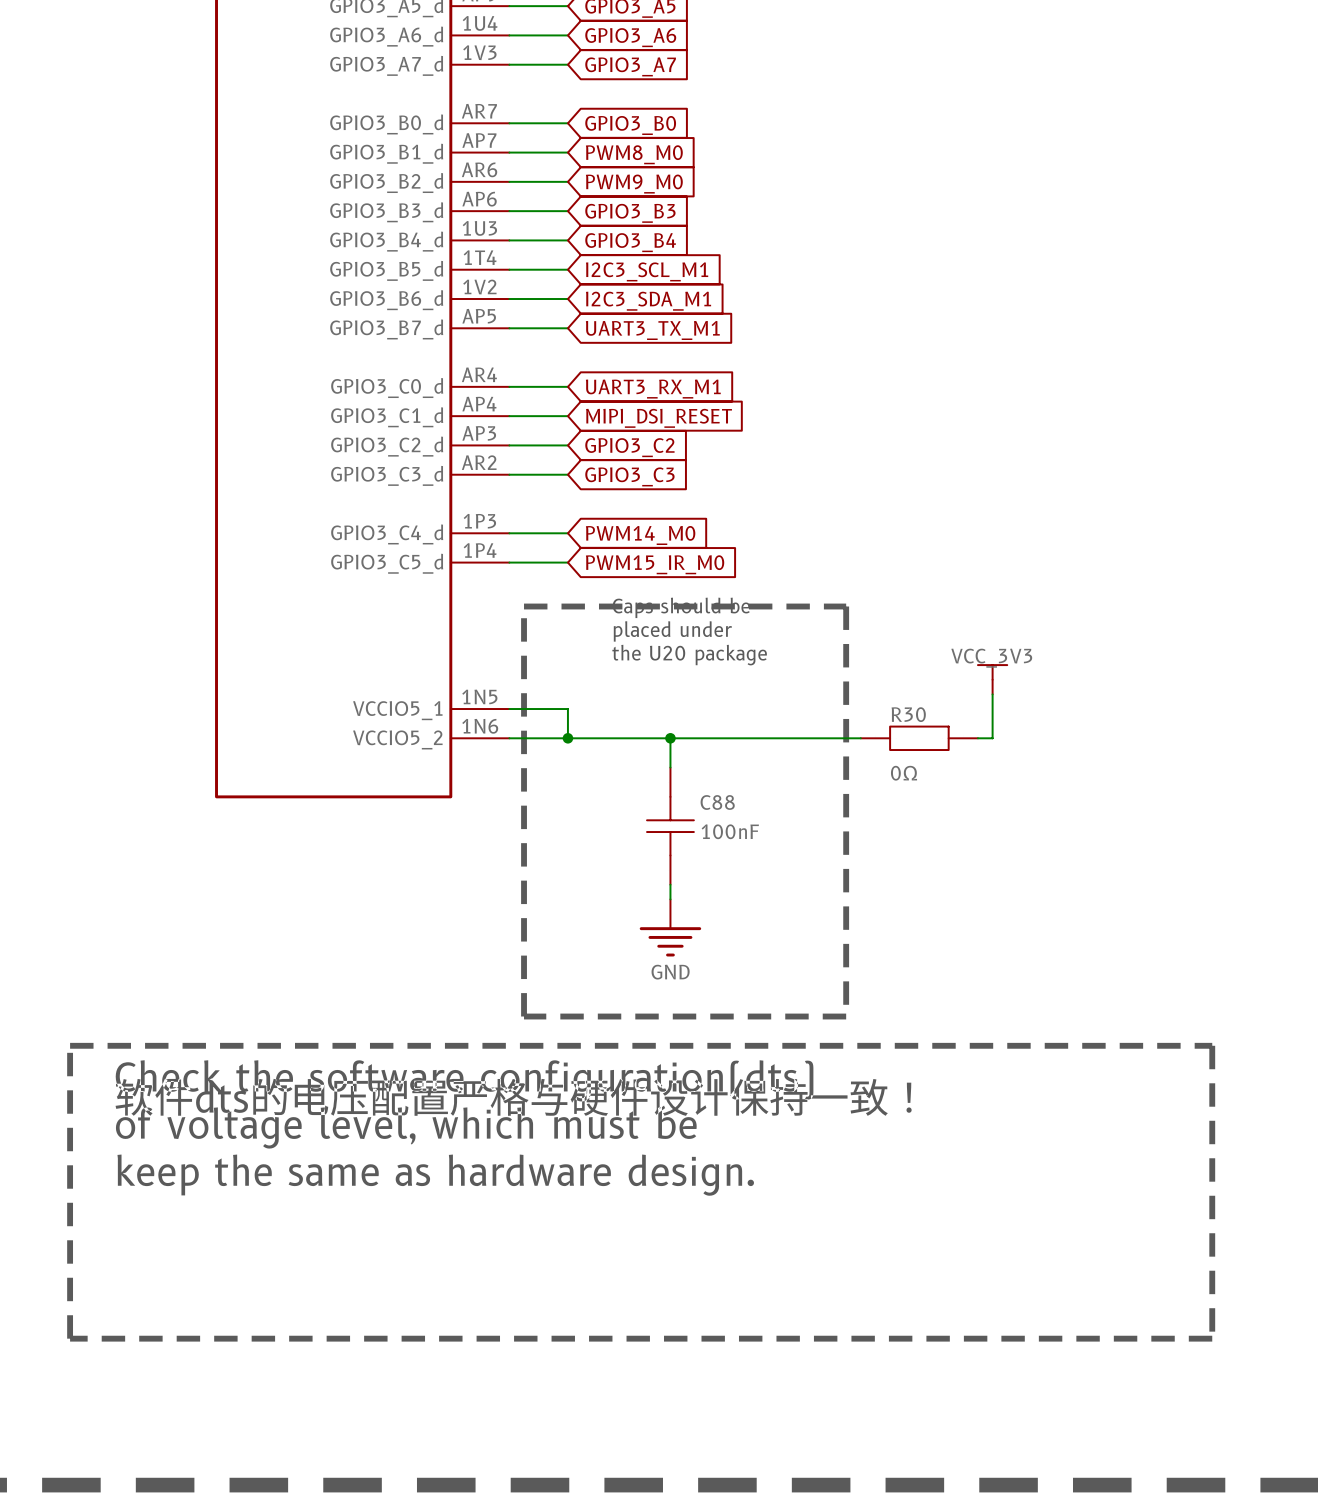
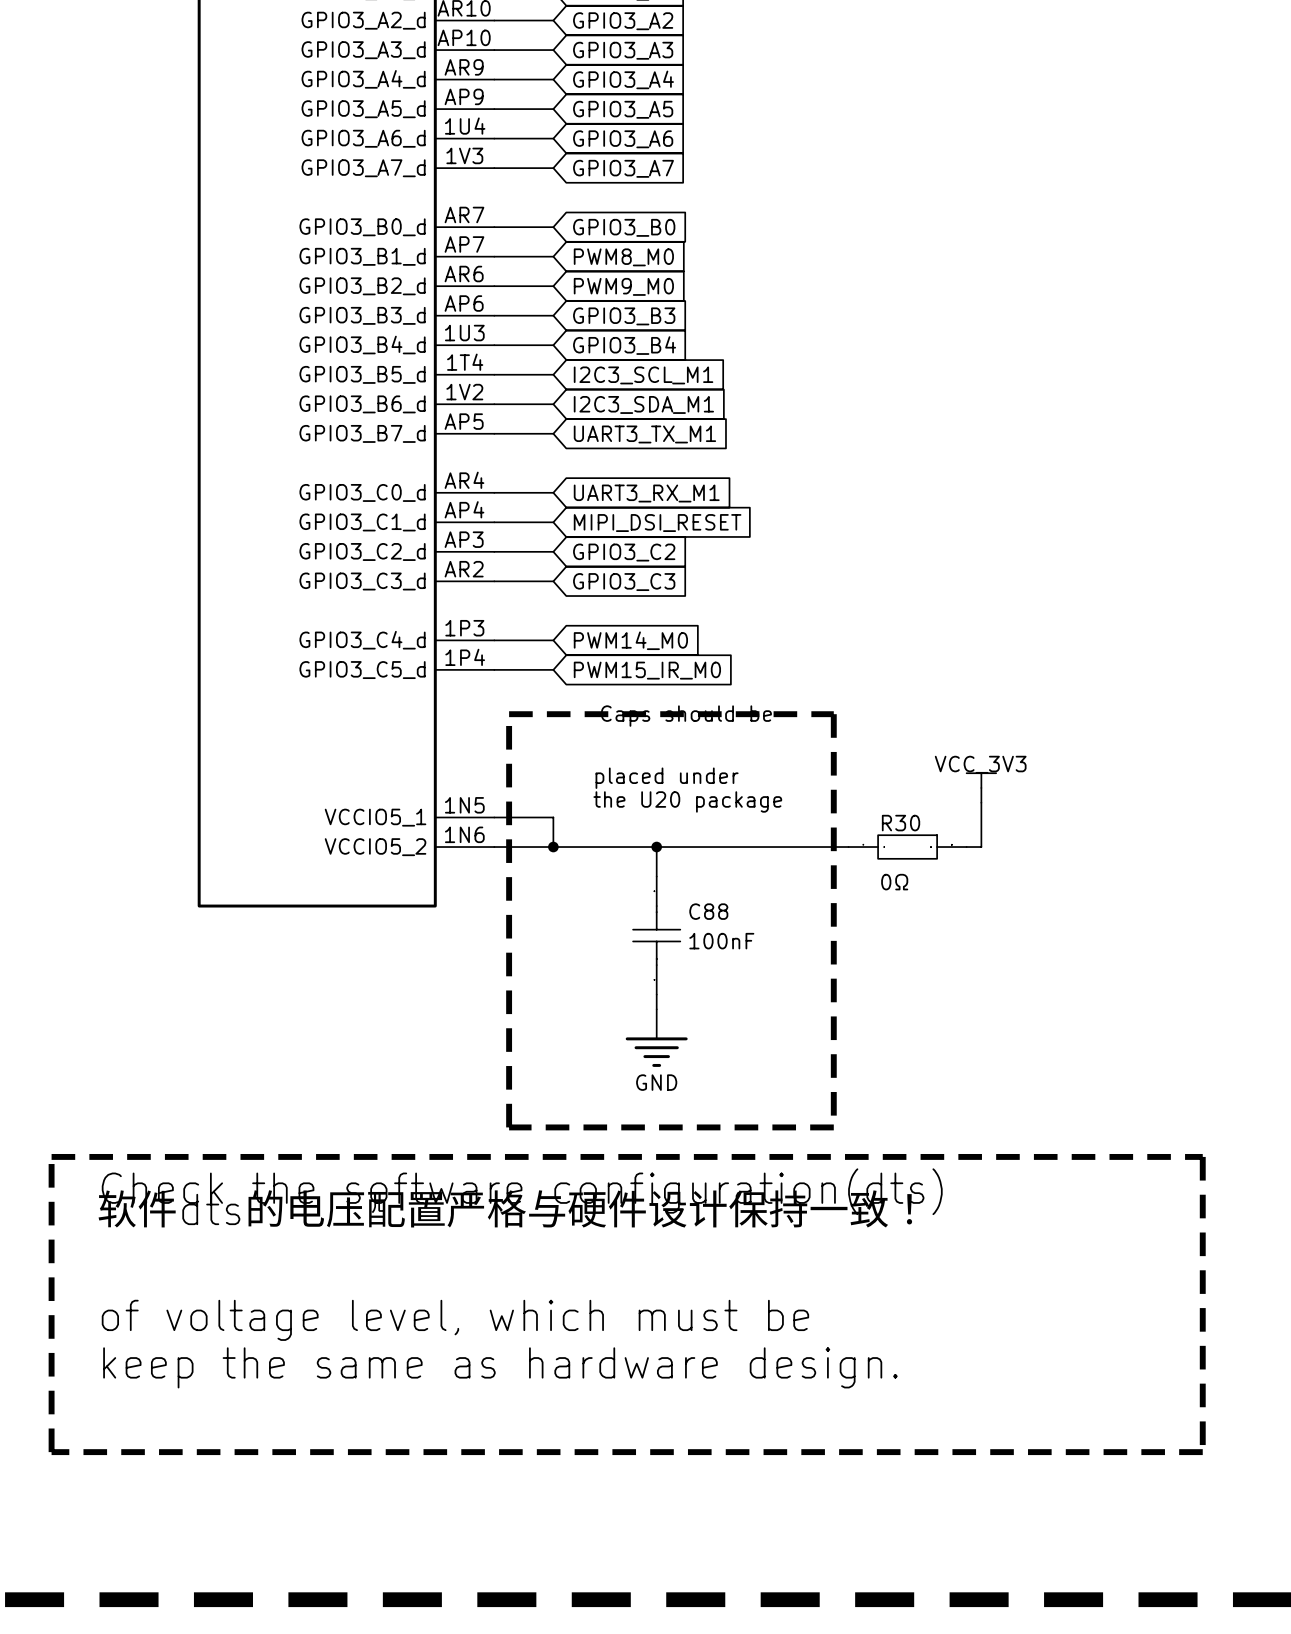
text position: placed under (672, 631) -> placed under (667, 778)
text position: the U20 package (689, 655) -> the U20 package (687, 801)
text position: of voltage level, which must be (406, 1127) -> of voltage level, which must be (455, 1320)
text position: keep the same as hardware design. (435, 1175) -> keep the same as hardware design. (500, 1367)

